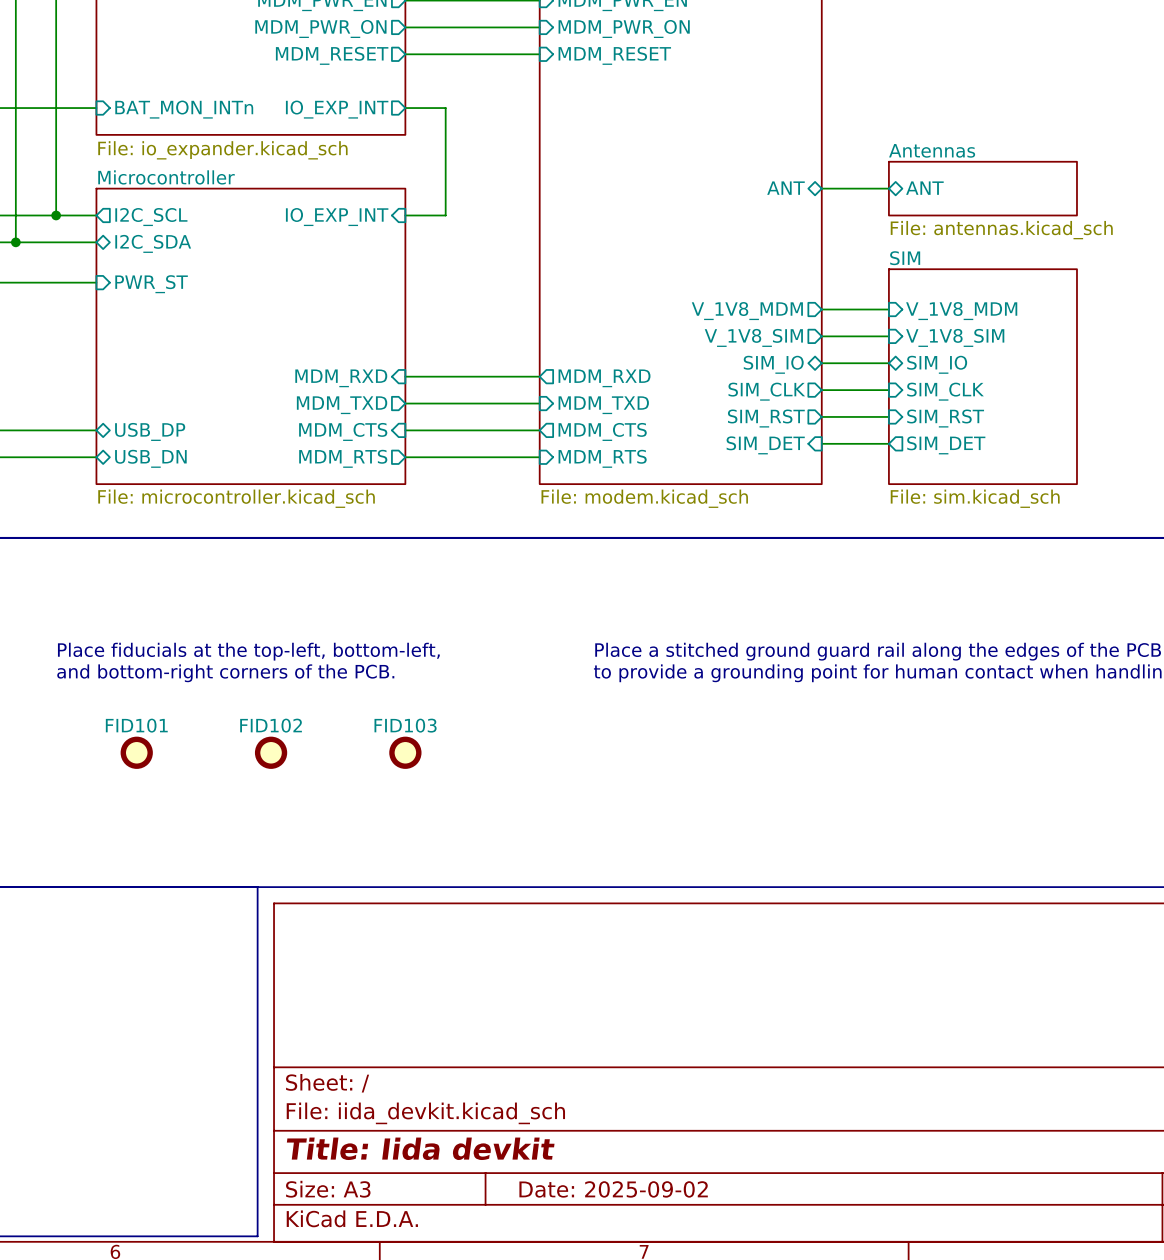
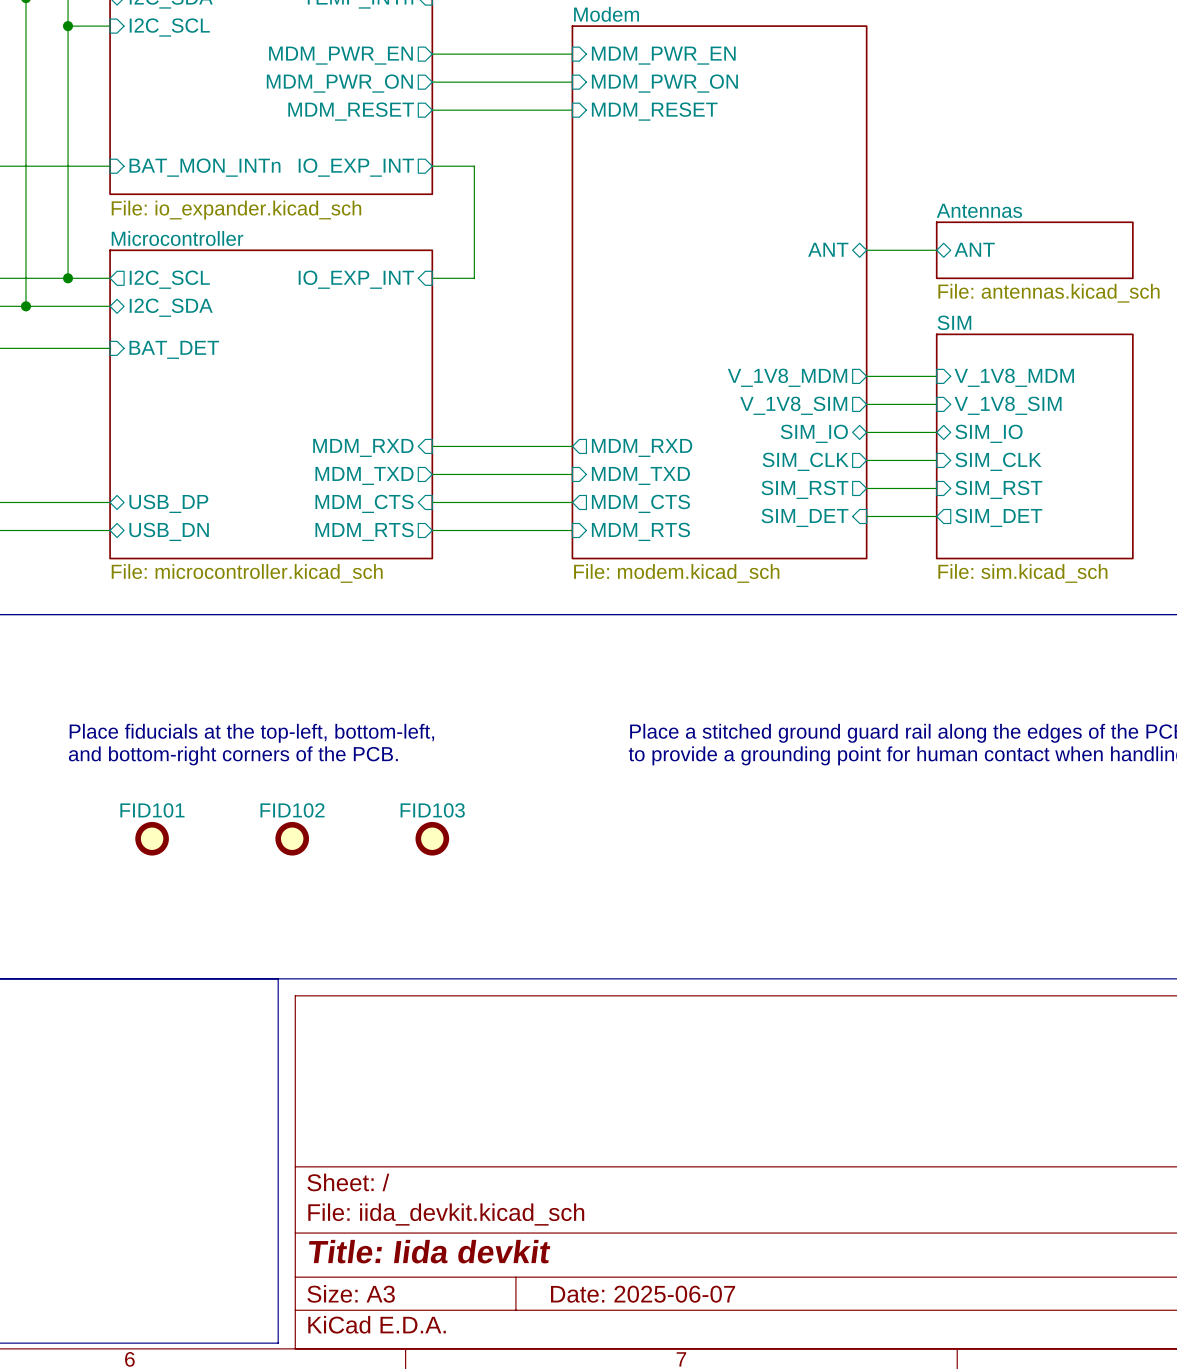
sheet pin: PWR_ST (151, 284) -> BAT_DET (174, 349)
title block: Date: 2025-09-02 (613, 1189) -> Date: 2025-06-07 (643, 1294)

